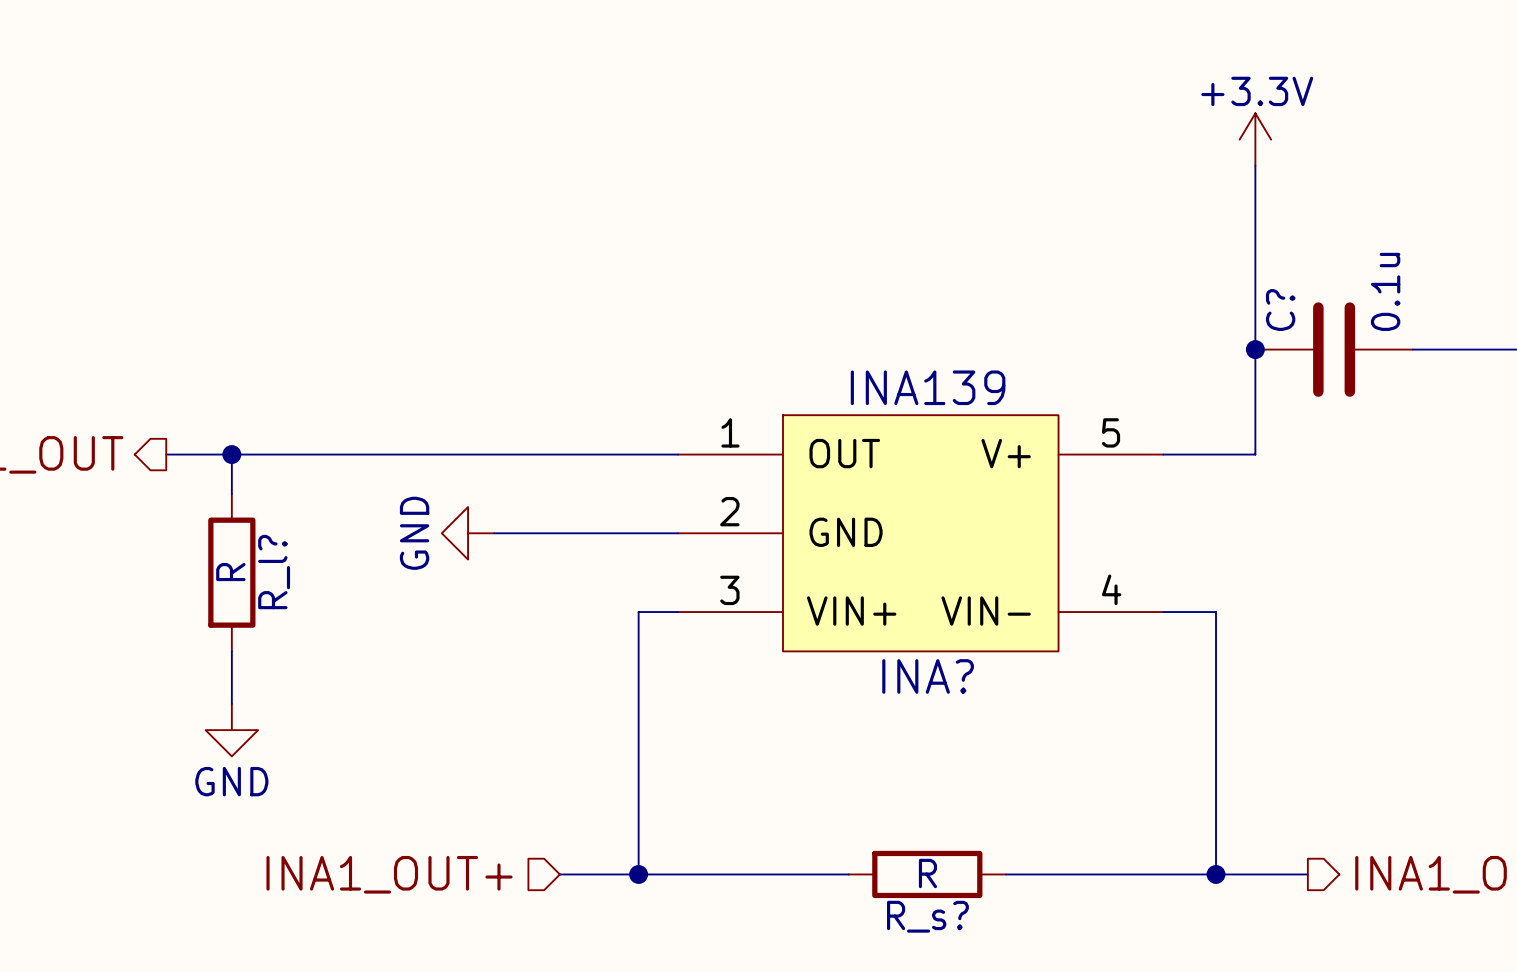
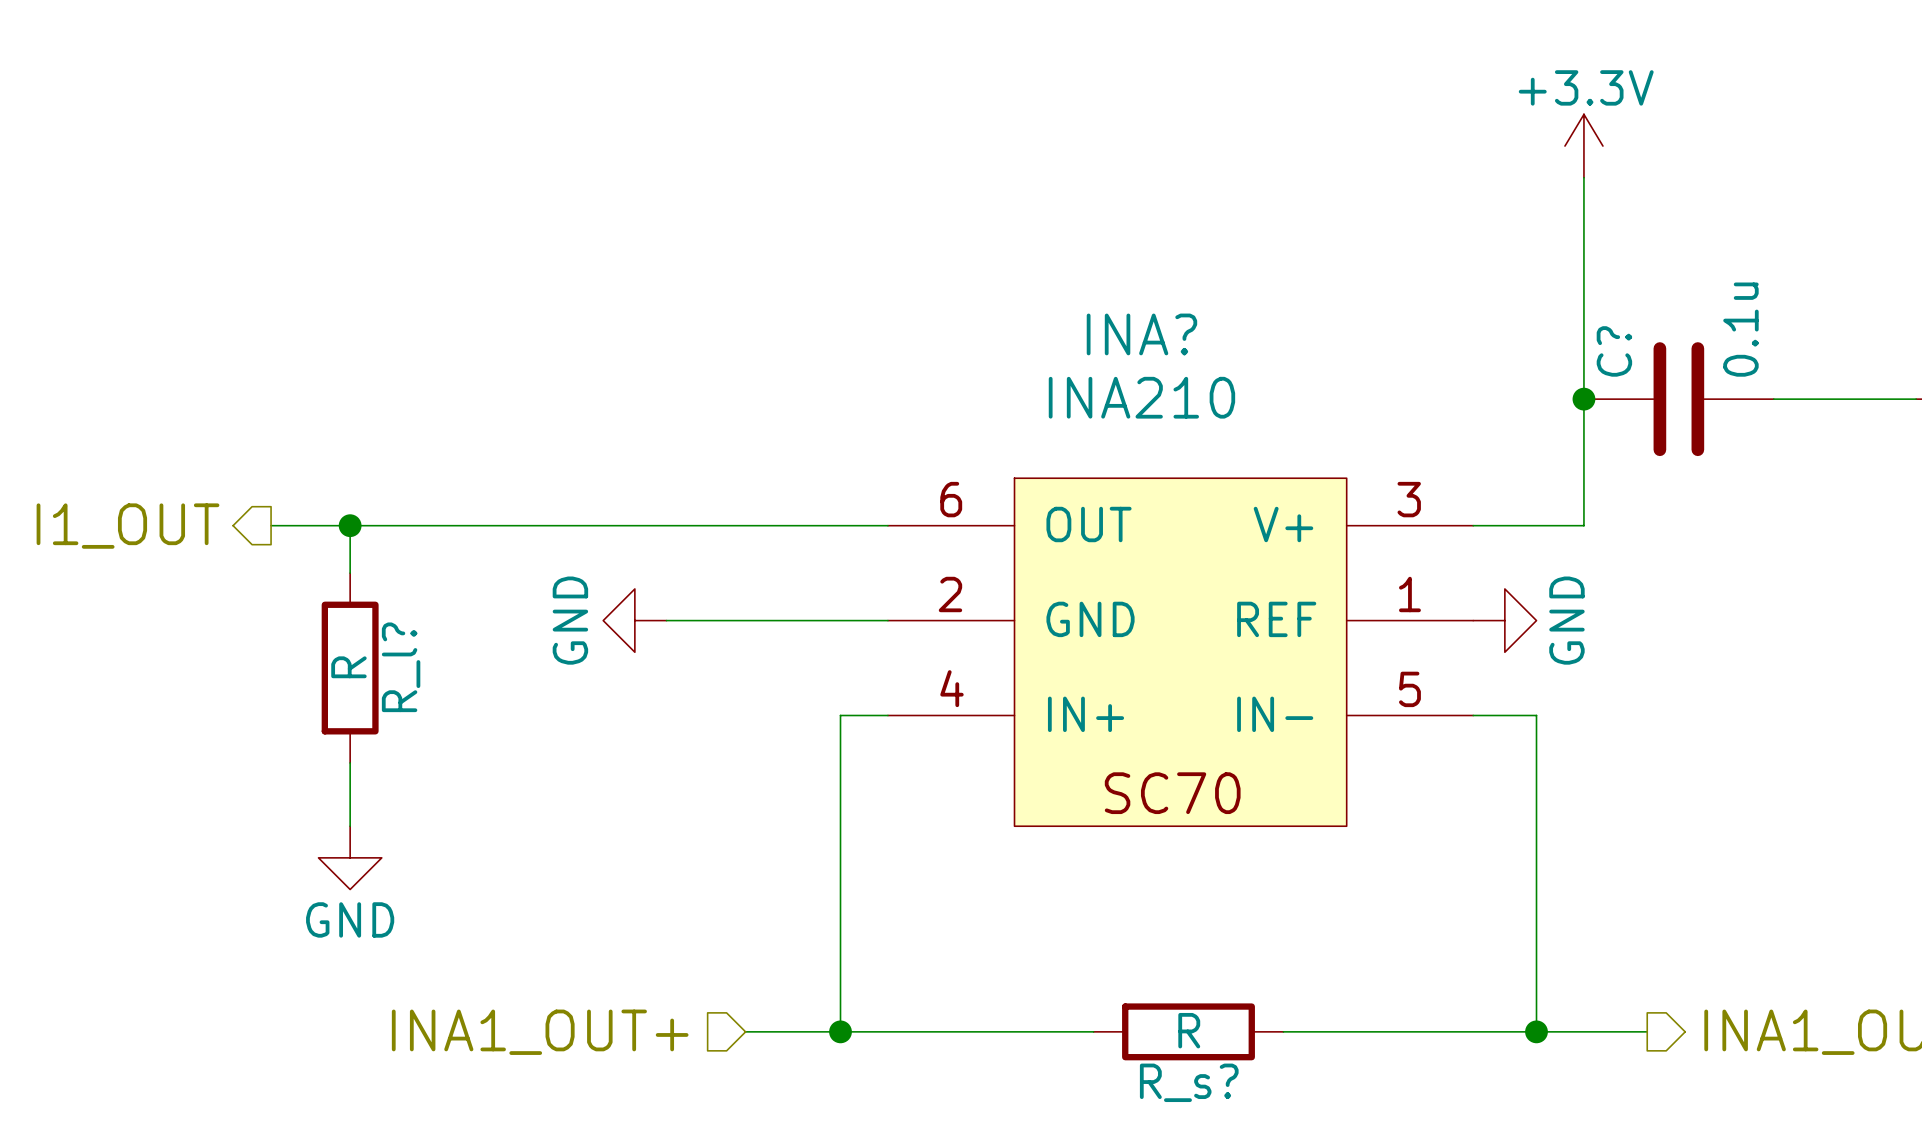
INA?: INA139 (920, 533) -> none
power symbol: none -> GND (1504, 620)
INA?: none -> INA210 (1180, 652)

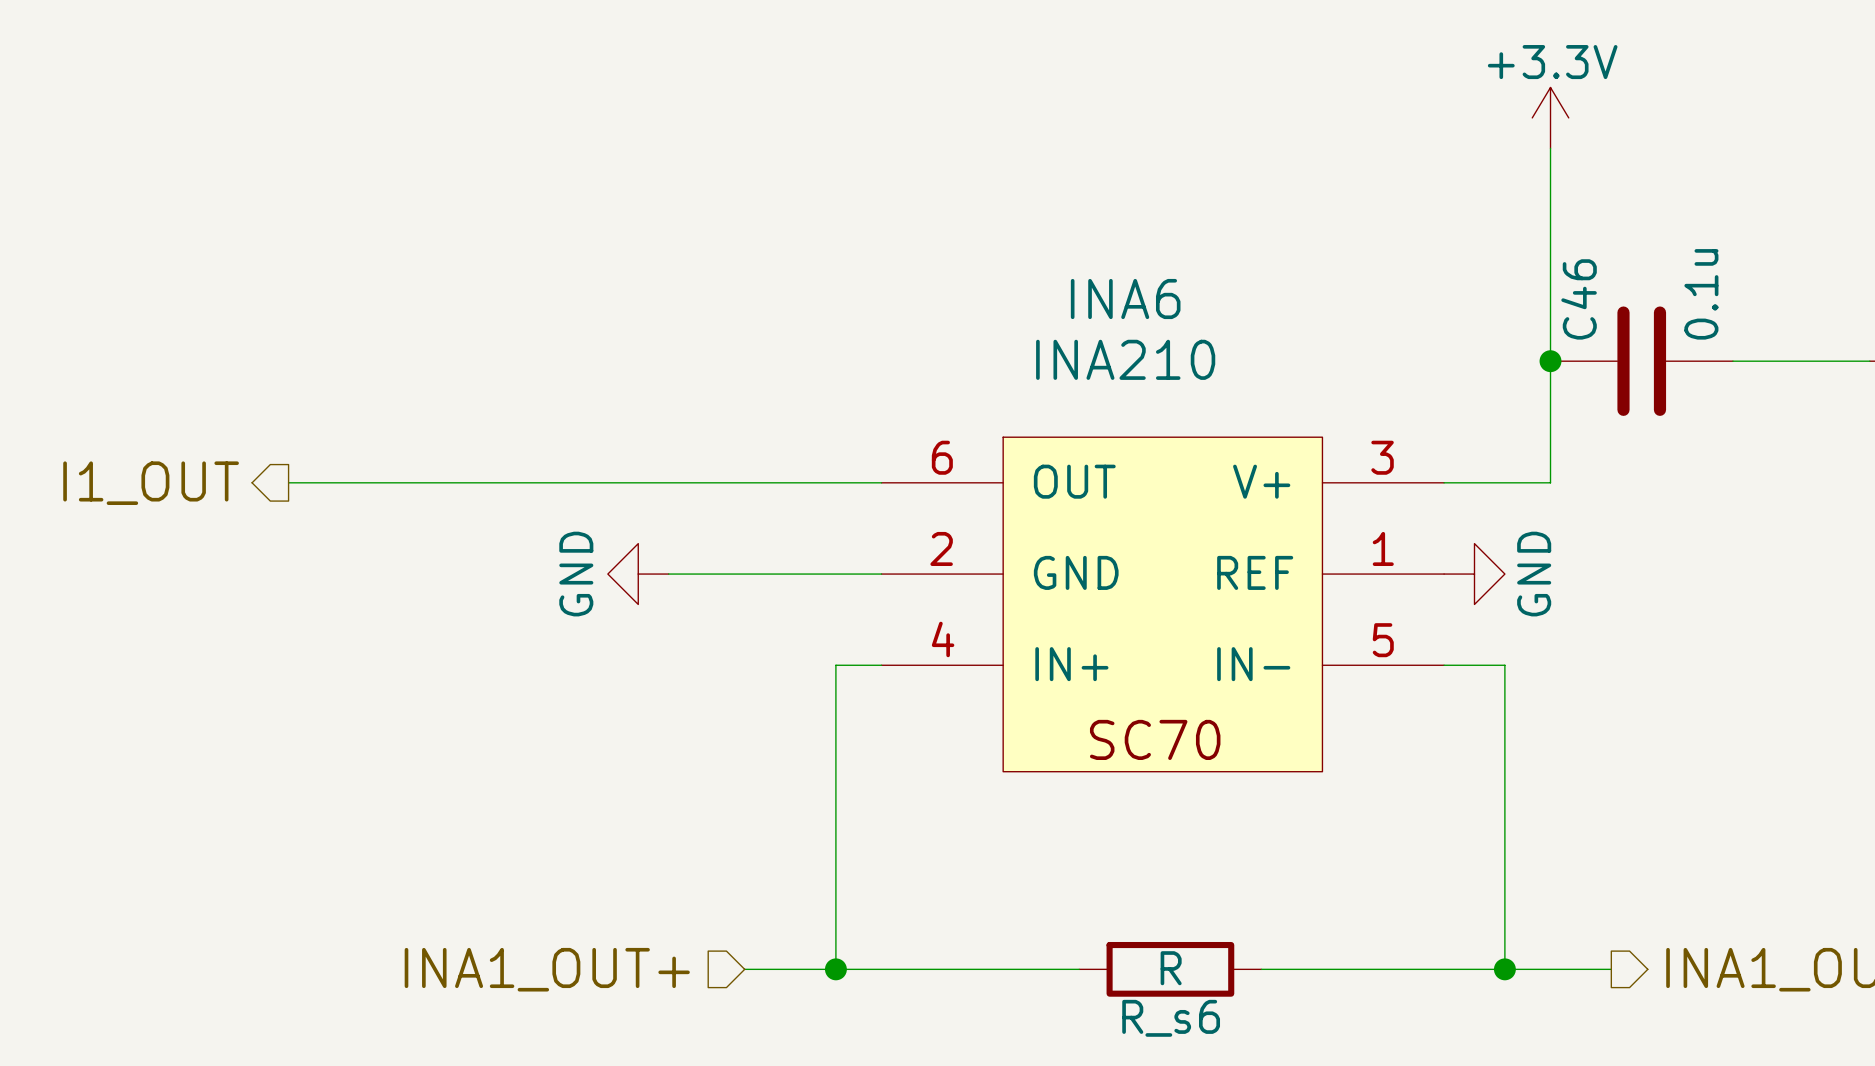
INA? name: INA? (1141, 334) -> INA6 (1125, 299)
C? name: C? (1614, 351) -> C46 (1579, 299)
wire: (350, 525) (350, 573) -> none
junction: (350, 525) -> none
R_l?: R (350, 668) -> none
wire: (350, 762) (350, 826) -> none
power symbol: GND (350, 857) -> none
R_s? name: R_s? (1189, 1082) -> R_s6 (1171, 1018)

